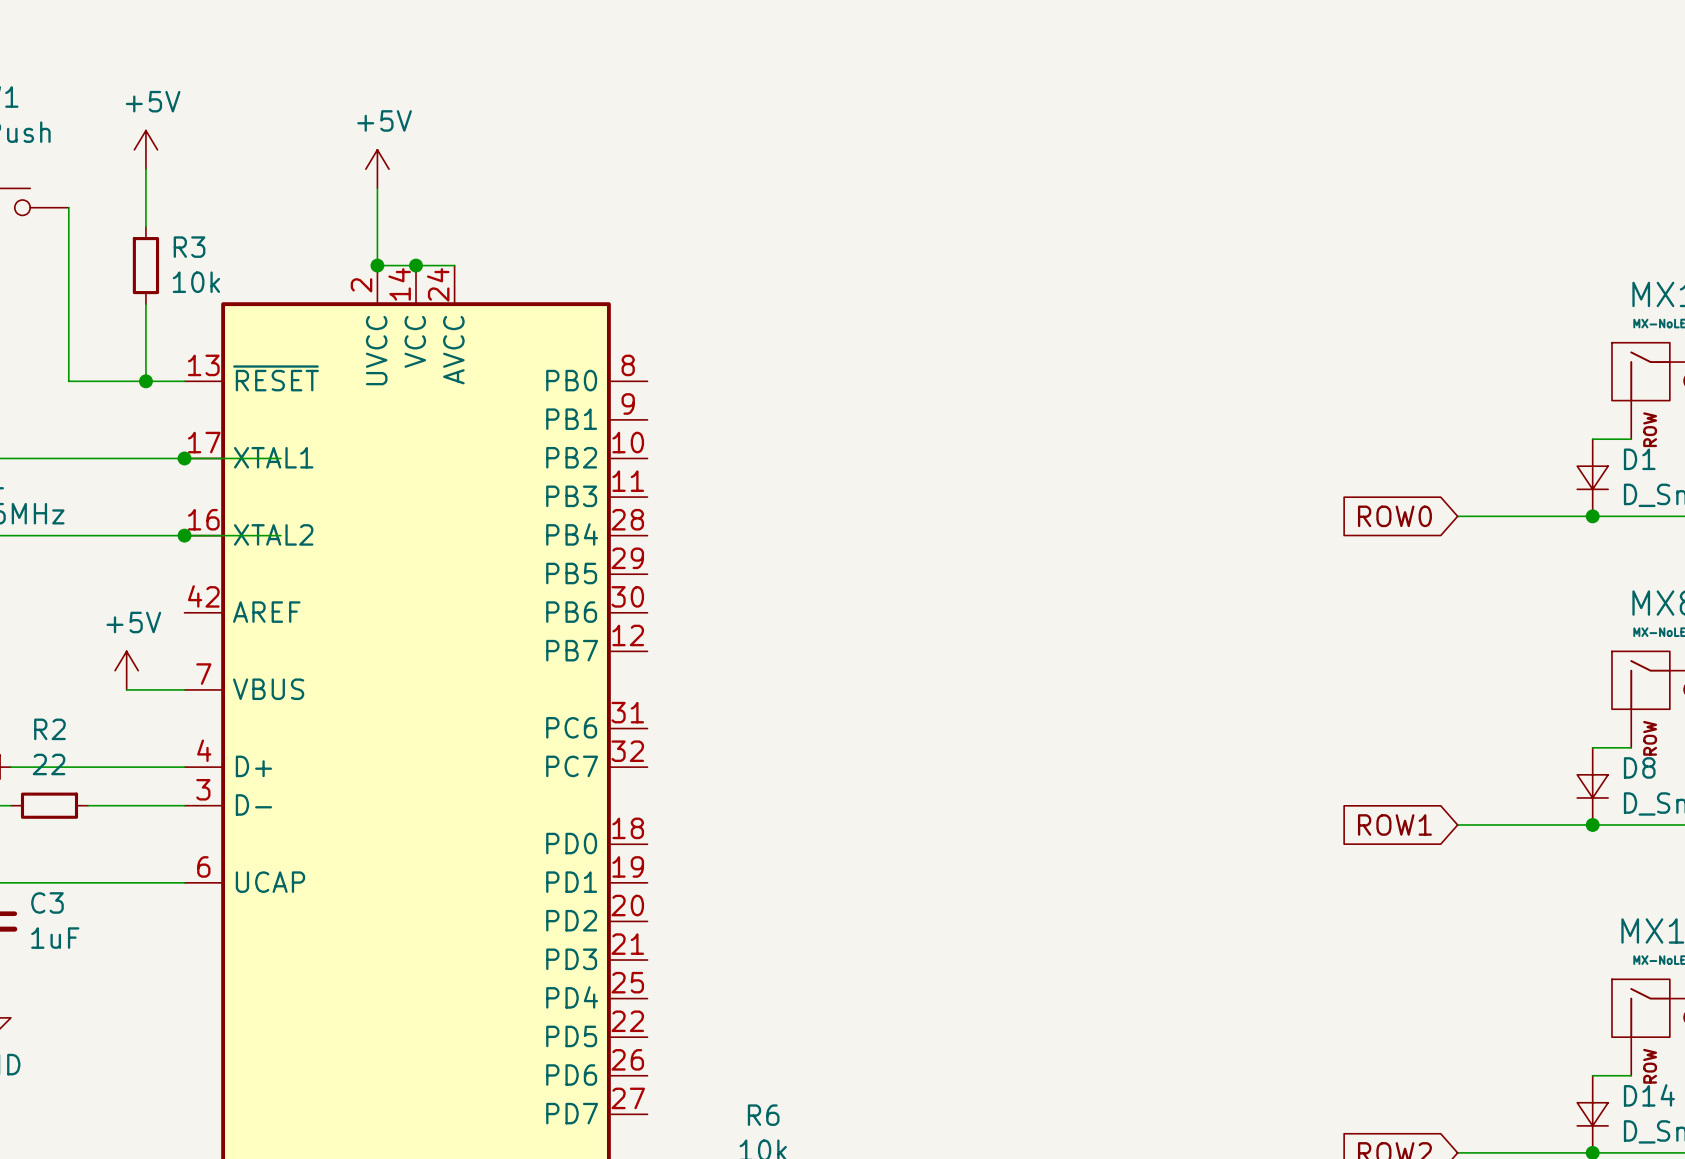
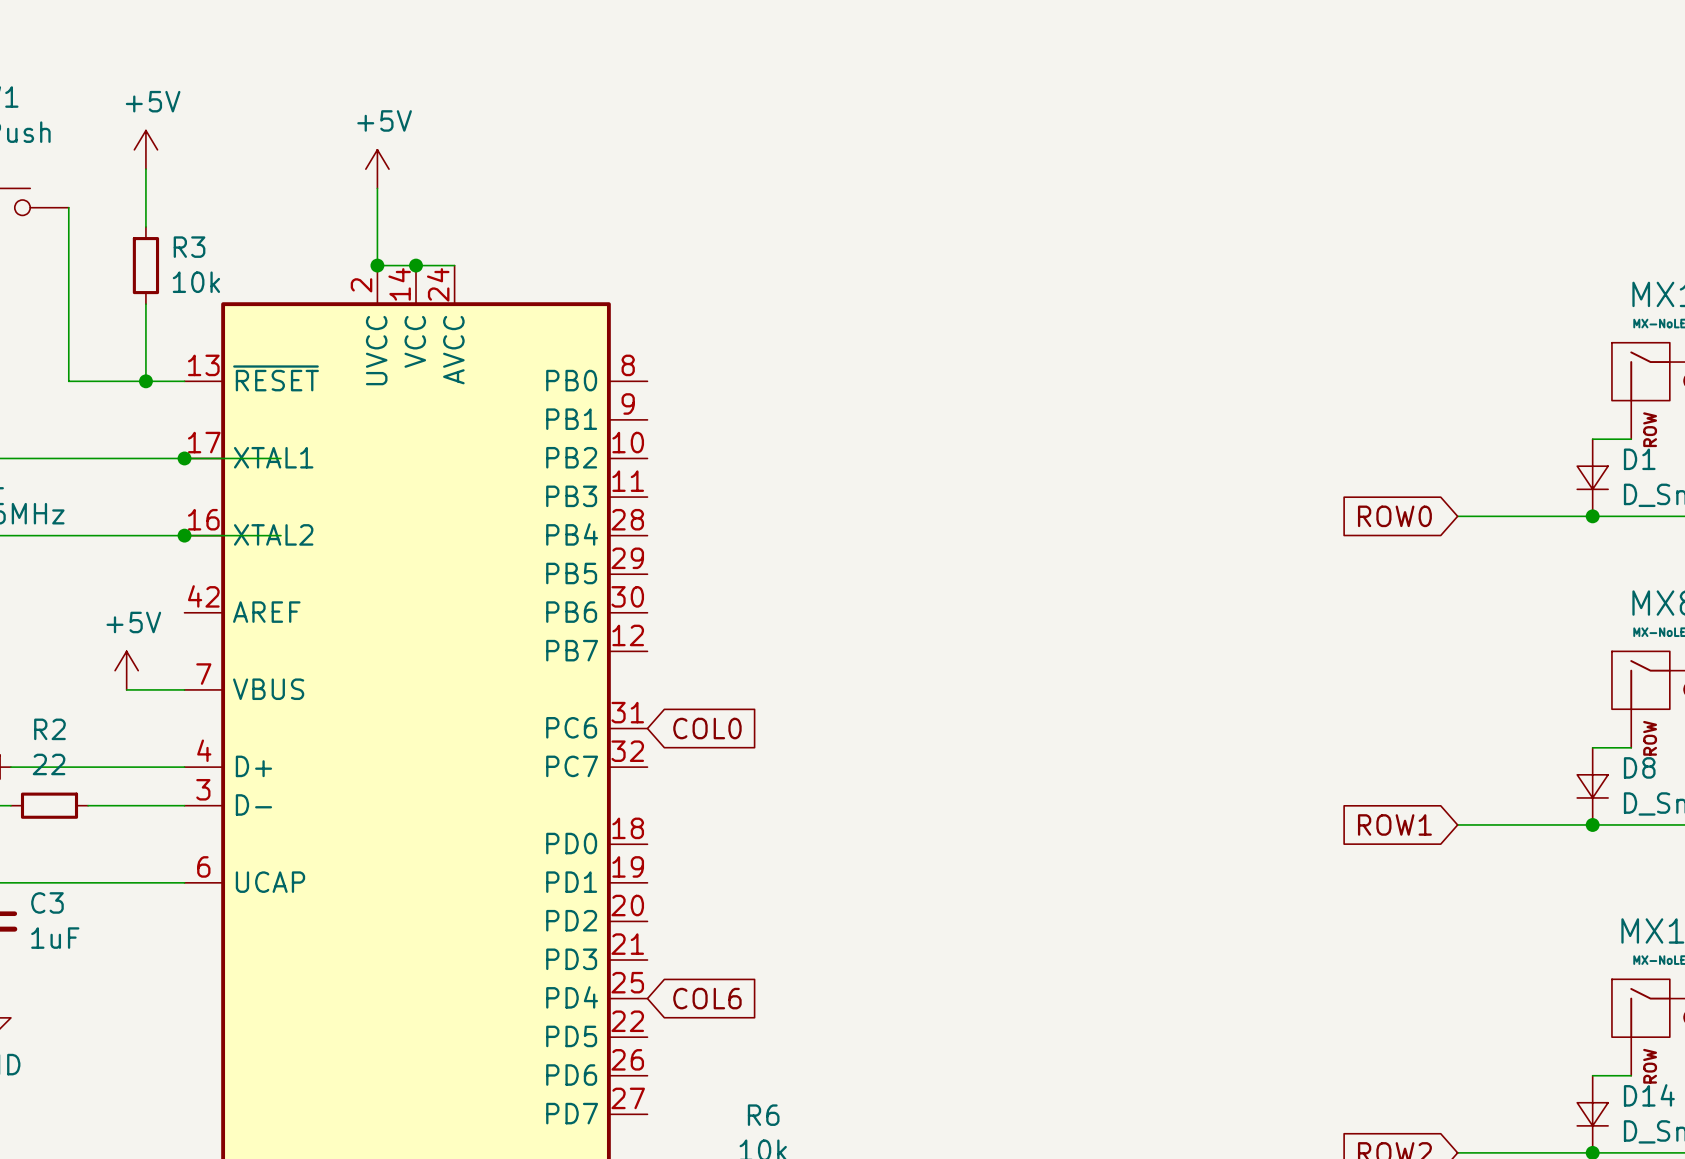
global label: none -> COL0 (707, 728)
global label: none -> COL6 (707, 998)

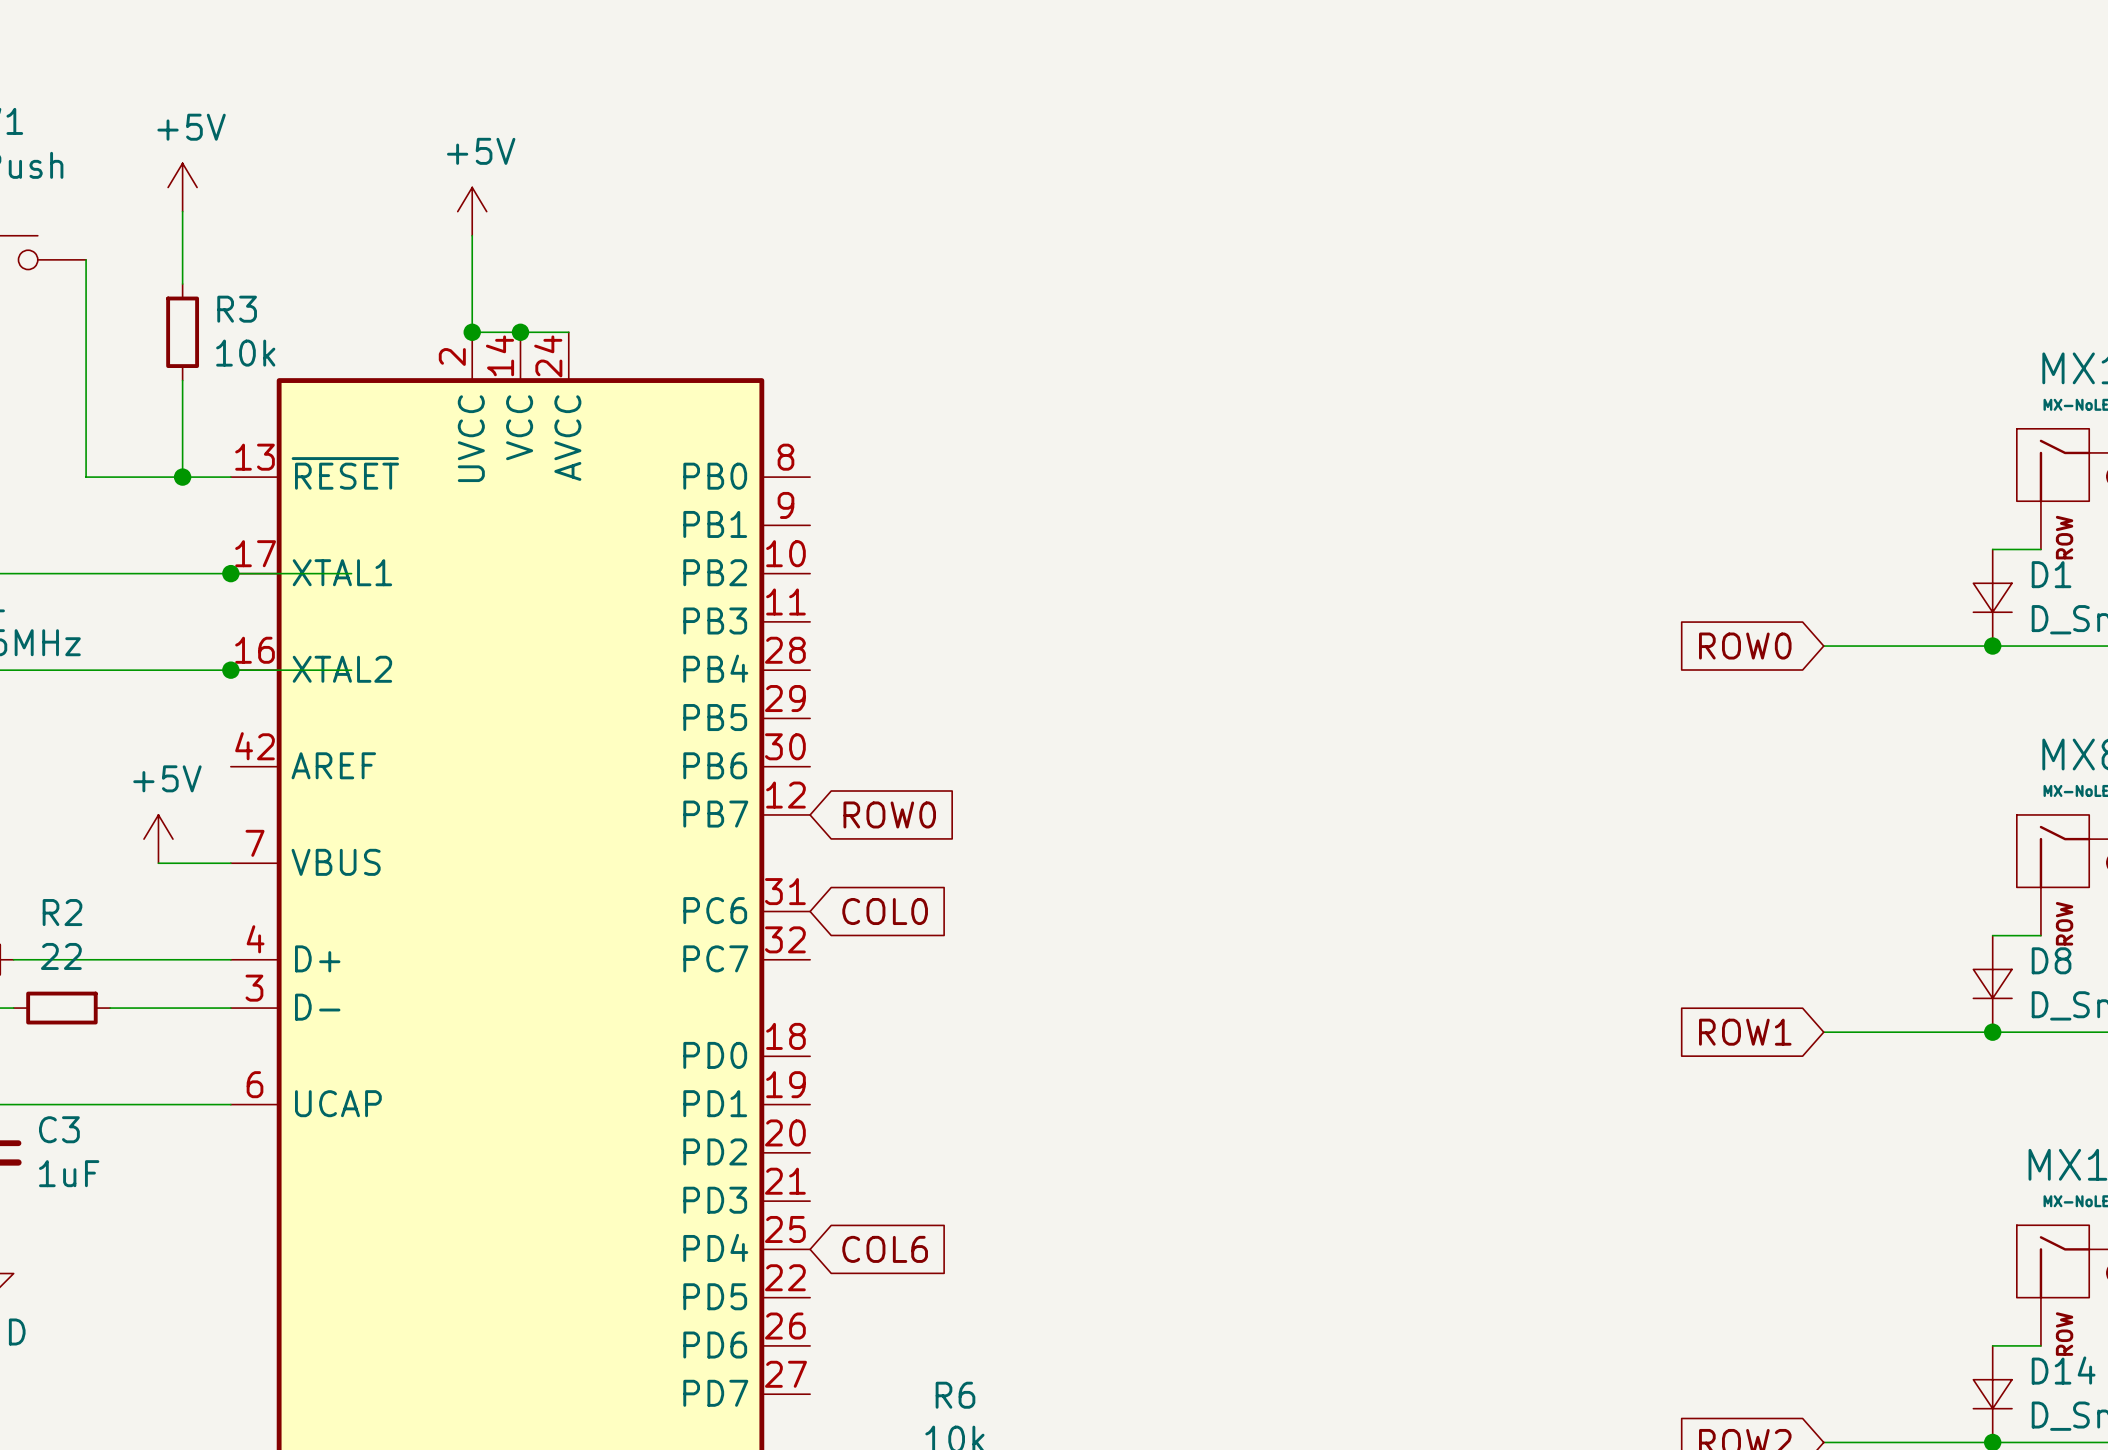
global label: none -> ROW0 (889, 814)

